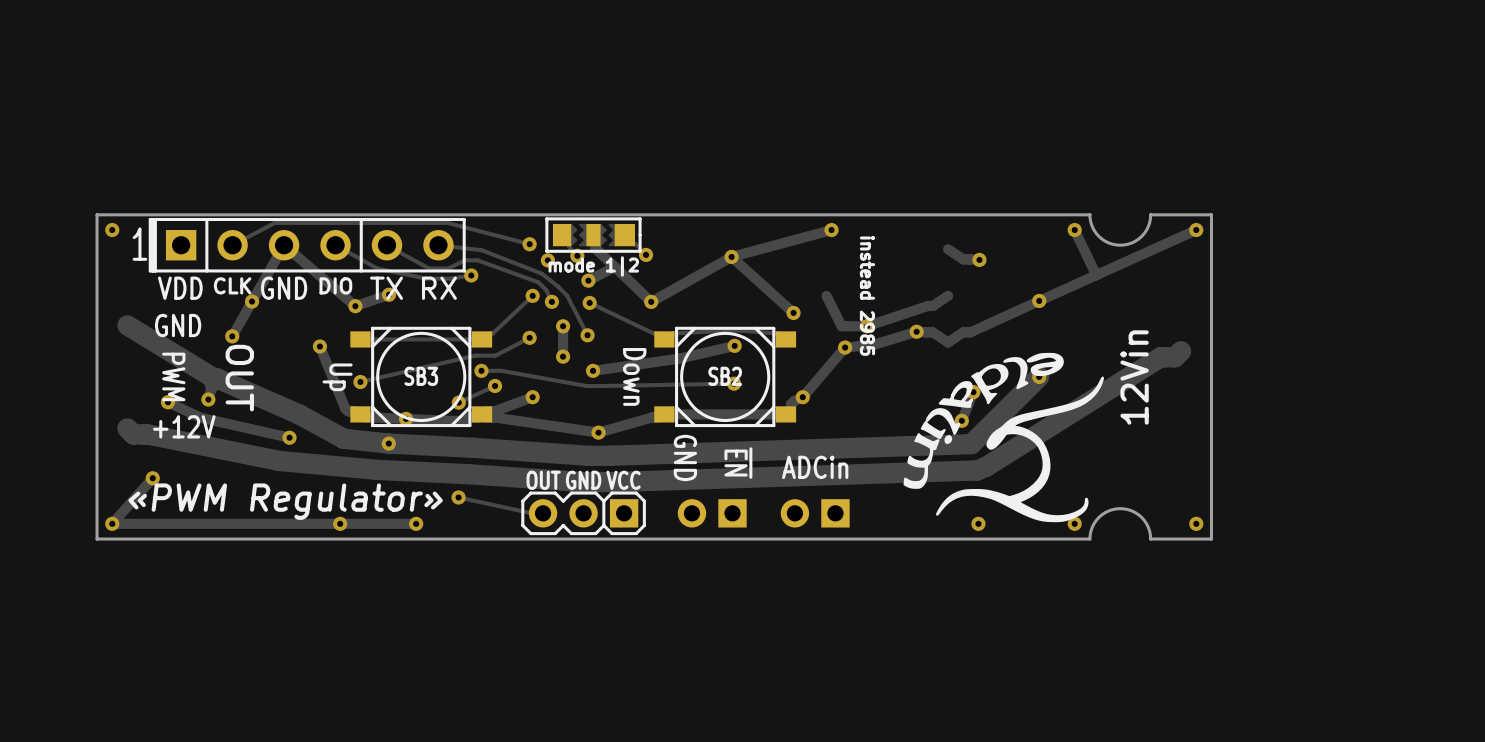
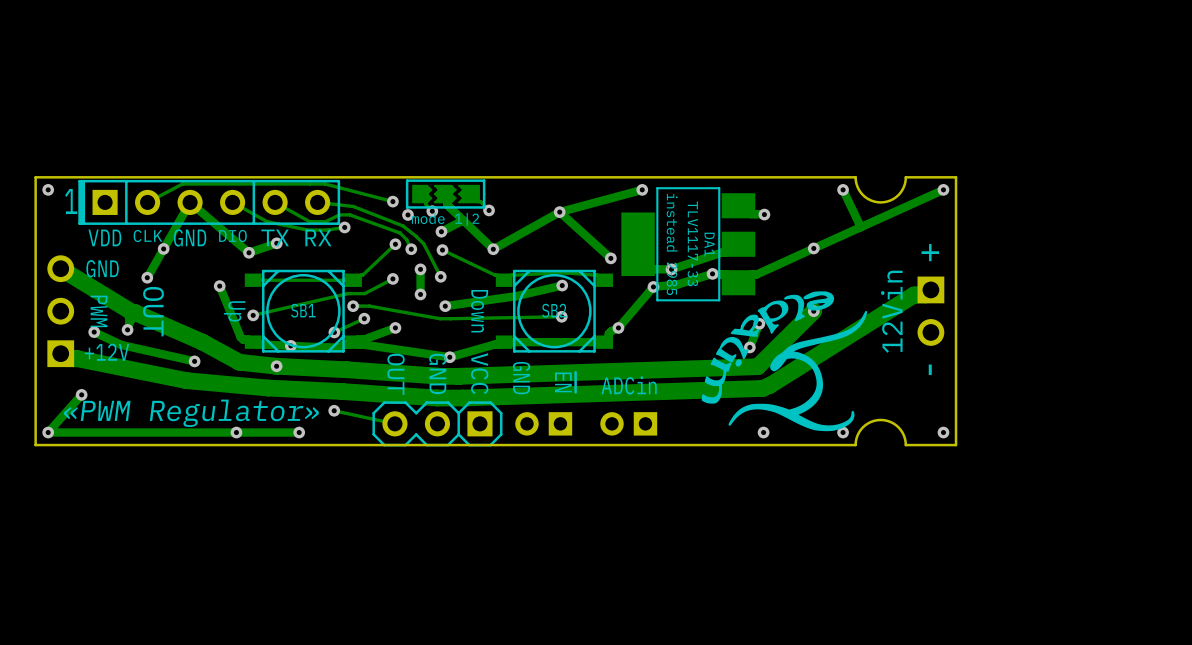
DA1: none -> TLV1117-33 (688, 244)
part: none -> (60, 311)
SB3 name: SB3 (421, 376) -> SB1 (303, 310)
part: none -> (930, 311)
part footprint: [521, 491, 646, 536] -> [372, 401, 503, 447]

